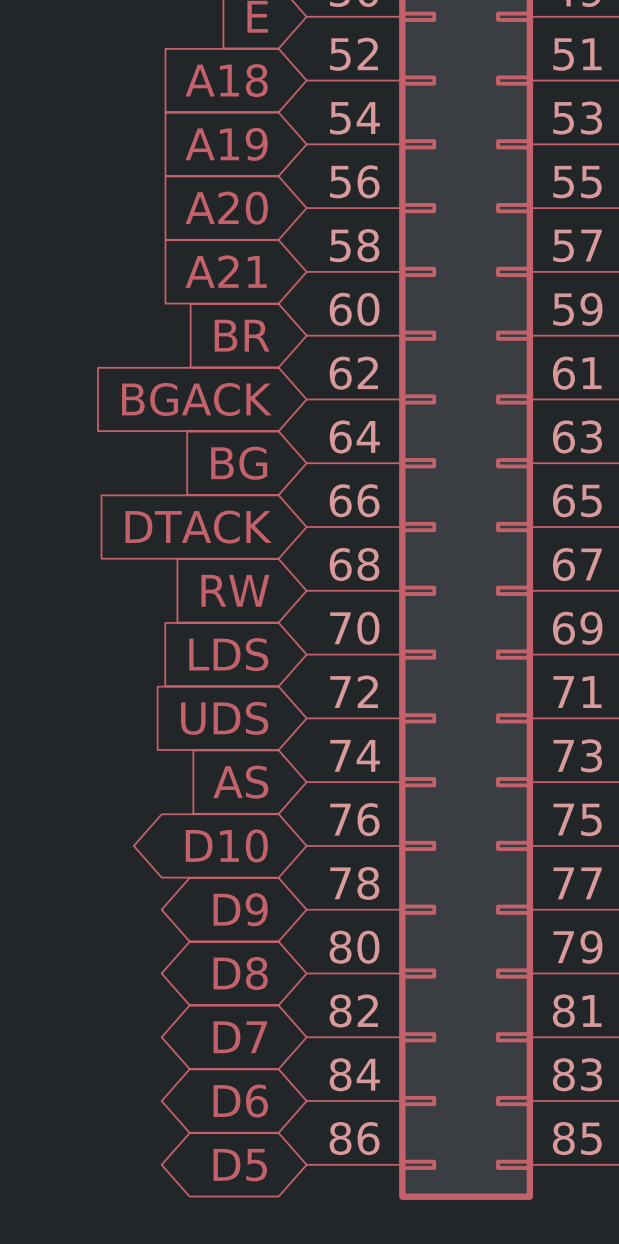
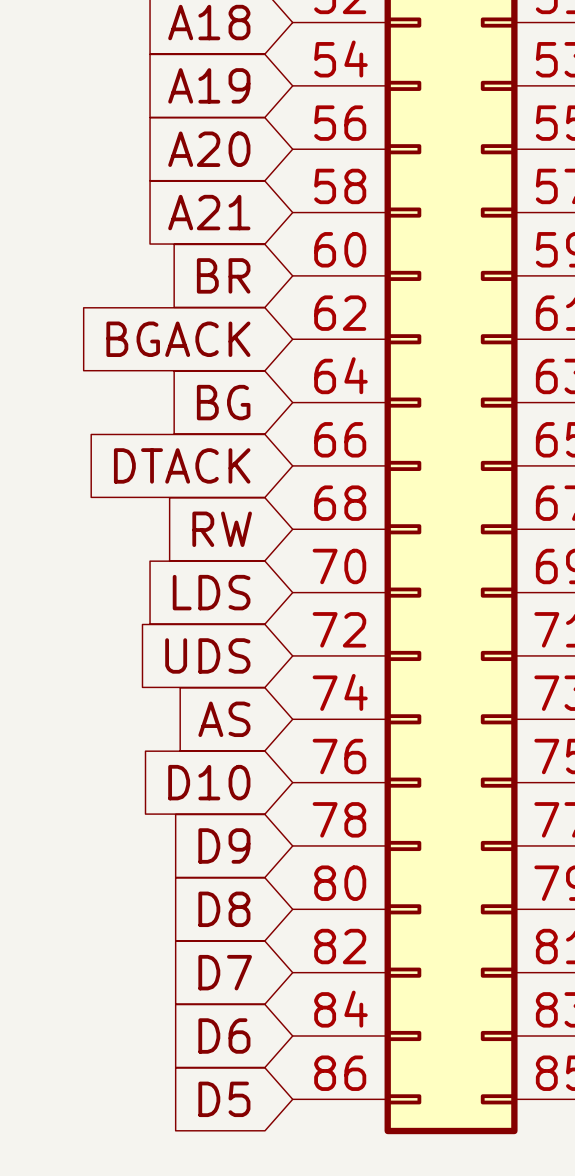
global label shape: bidirectional (226, 845) -> input (209, 782)
global label shape: bidirectional (240, 909) -> input (224, 845)
global label shape: bidirectional (240, 973) -> input (224, 909)
global label shape: bidirectional (240, 1037) -> input (225, 972)
global label shape: bidirectional (240, 1101) -> input (224, 1035)
global label shape: bidirectional (240, 1165) -> input (224, 1099)

